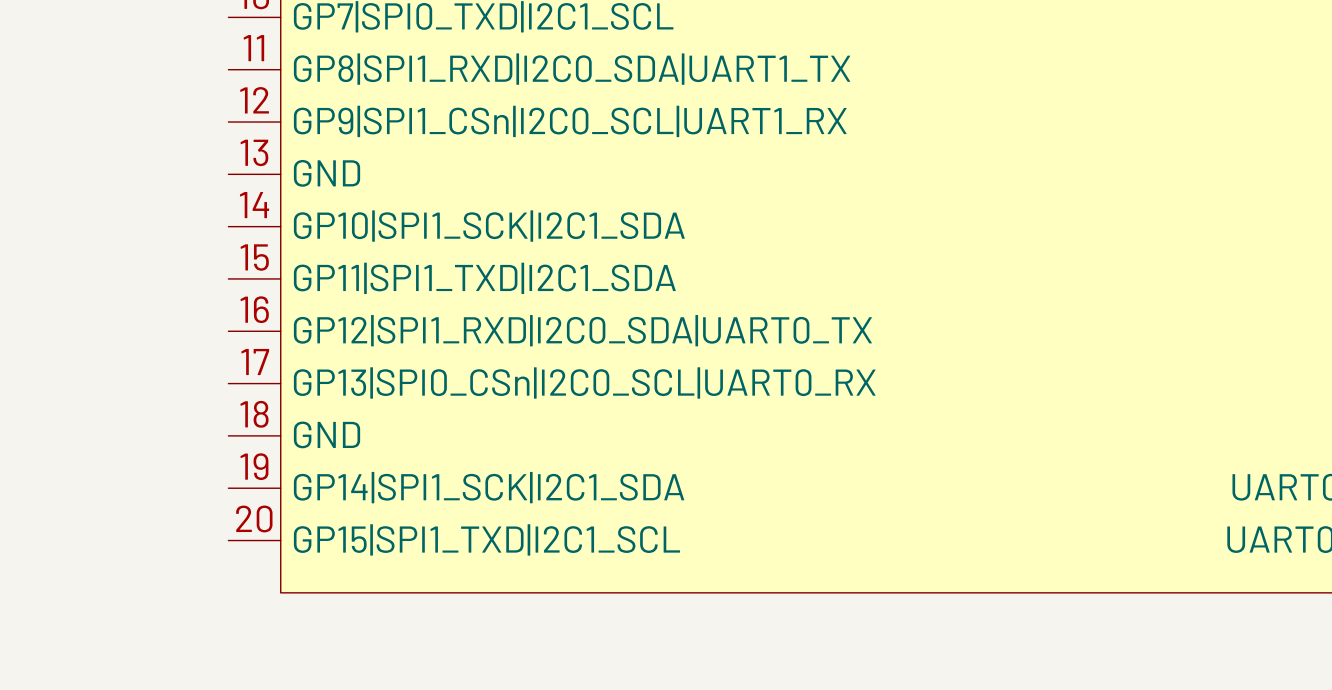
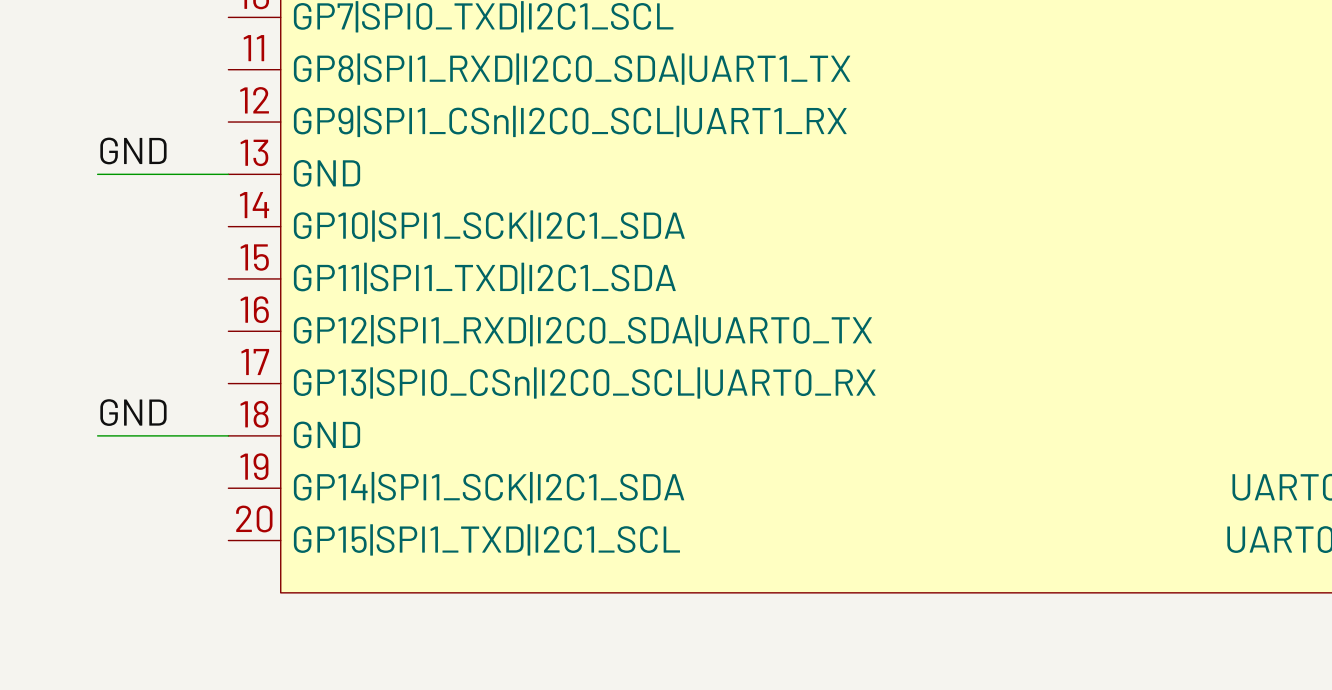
label: none -> GND (133, 150)
wire: none -> (97, 174) (228, 174)
label: none -> GND (133, 412)
wire: none -> (97, 435) (228, 435)

